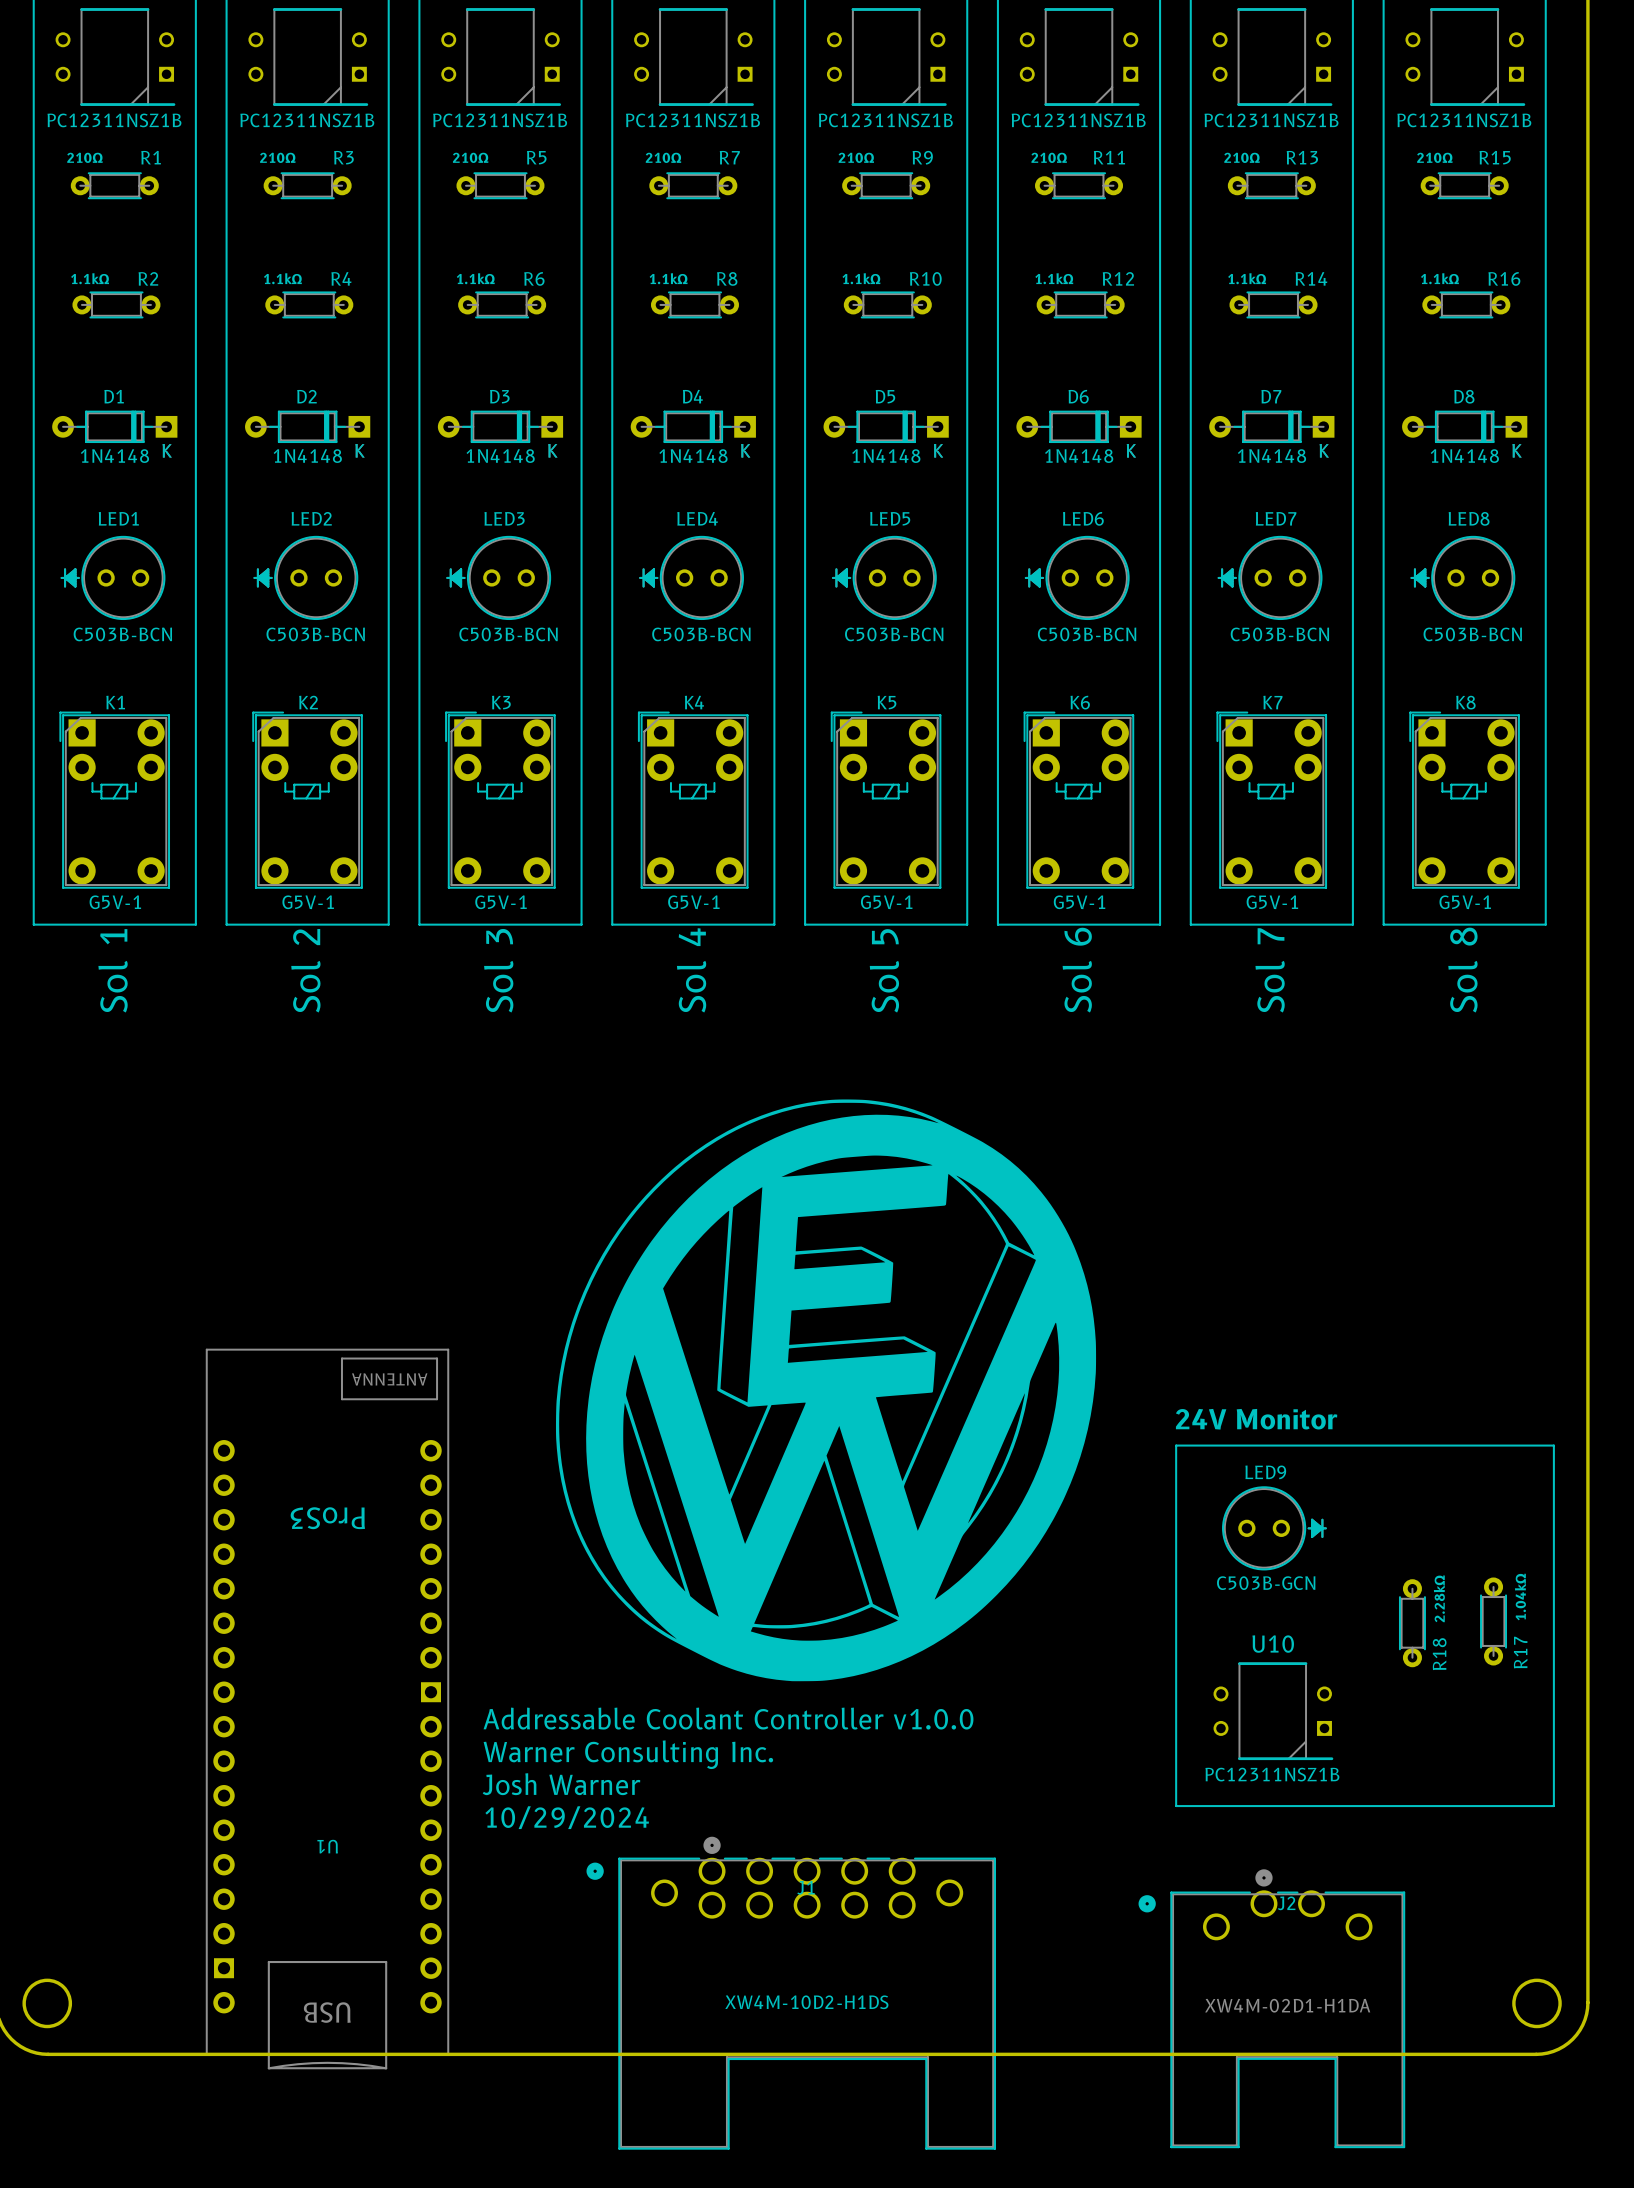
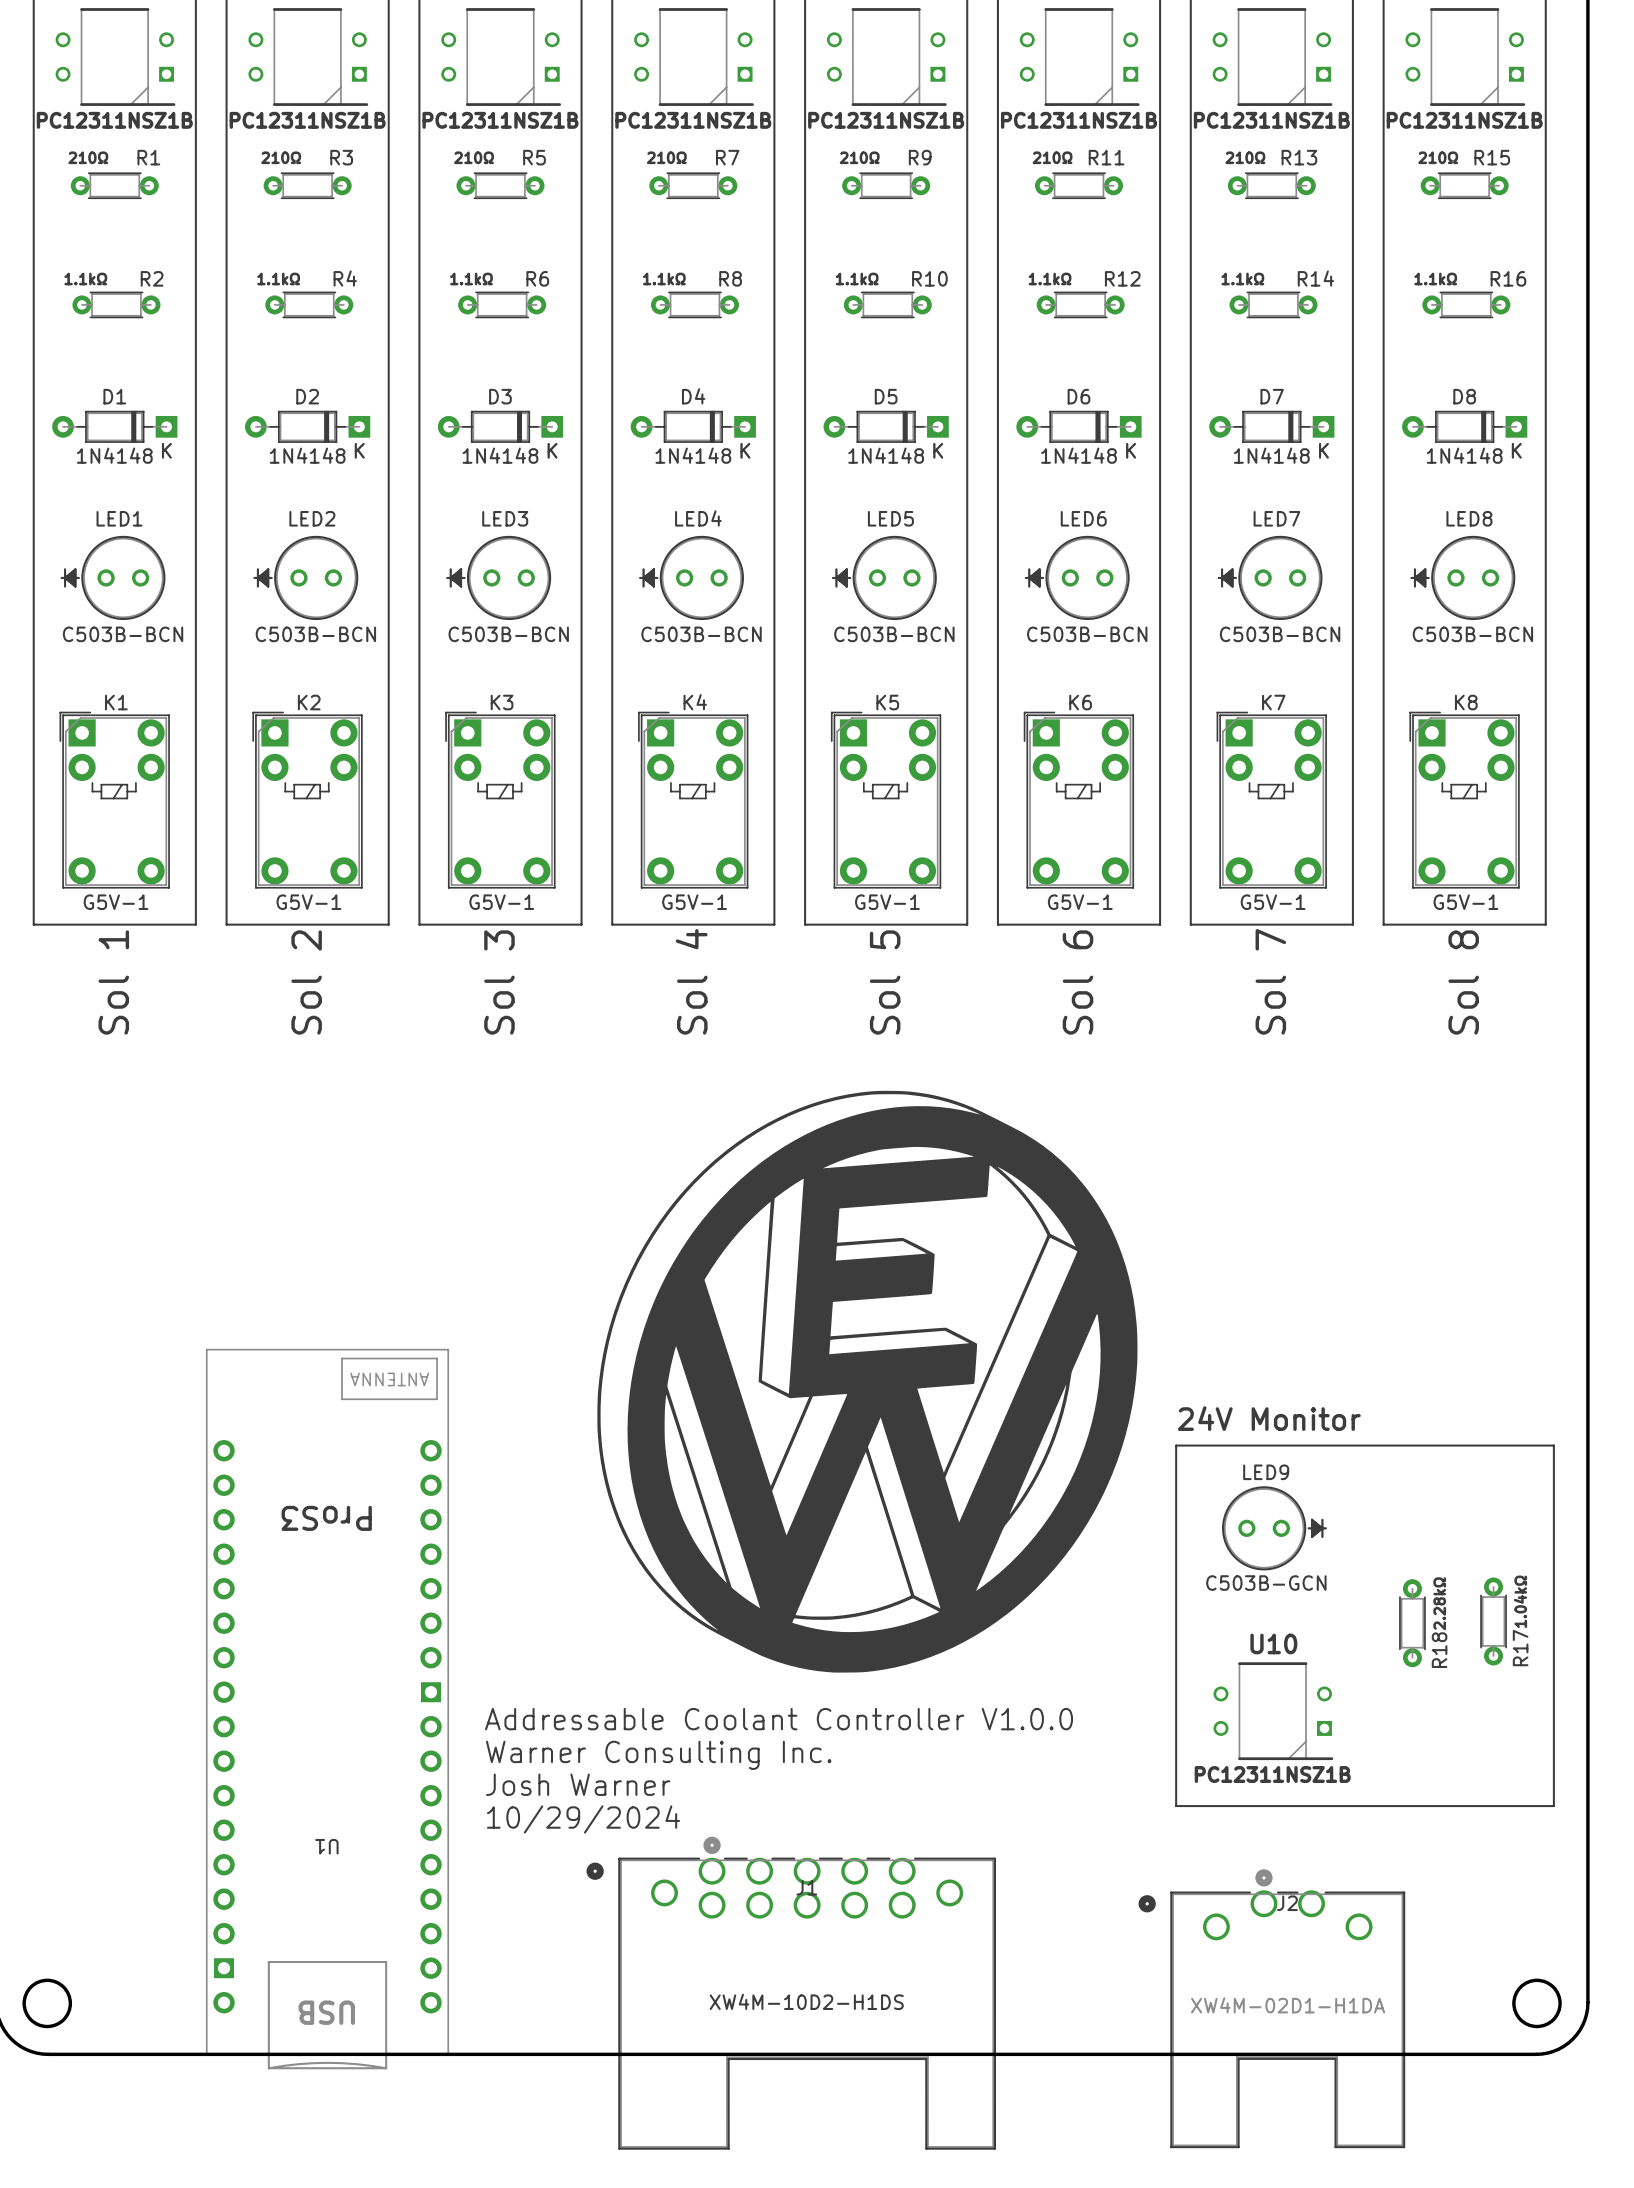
part position: (826, 1390) -> (867, 1381)
text: Addressable Coolant Controller v1.0.0 (728, 1718) -> Addressable Coolant Controller V1.0.0 (779, 1719)

